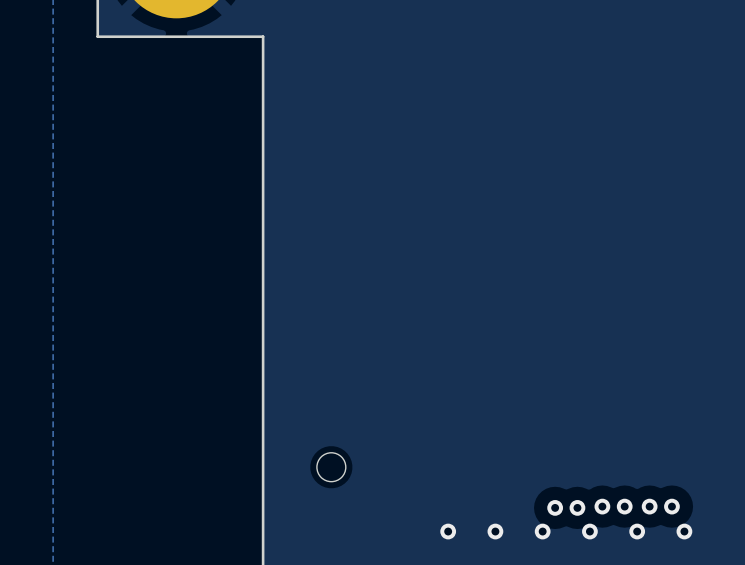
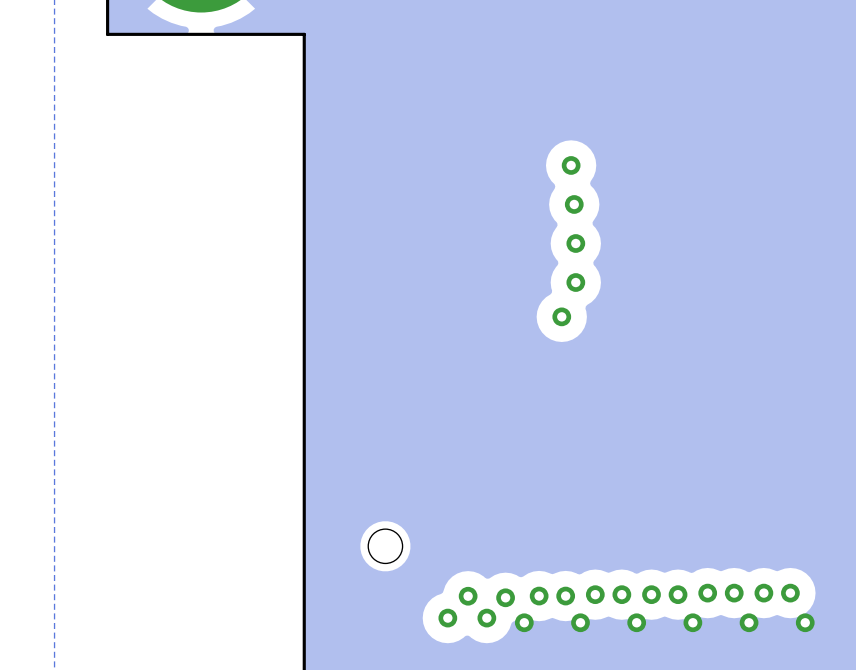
via: none -> (571, 165)
via: none -> (574, 204)
via: none -> (575, 243)
via: none -> (575, 282)
via: none -> (561, 316)
via: none -> (595, 594)
via: none -> (621, 594)
via: none -> (468, 596)
via: none -> (539, 596)
via: none -> (565, 596)
via: none -> (505, 597)
via: none -> (447, 618)
via: none -> (486, 618)

